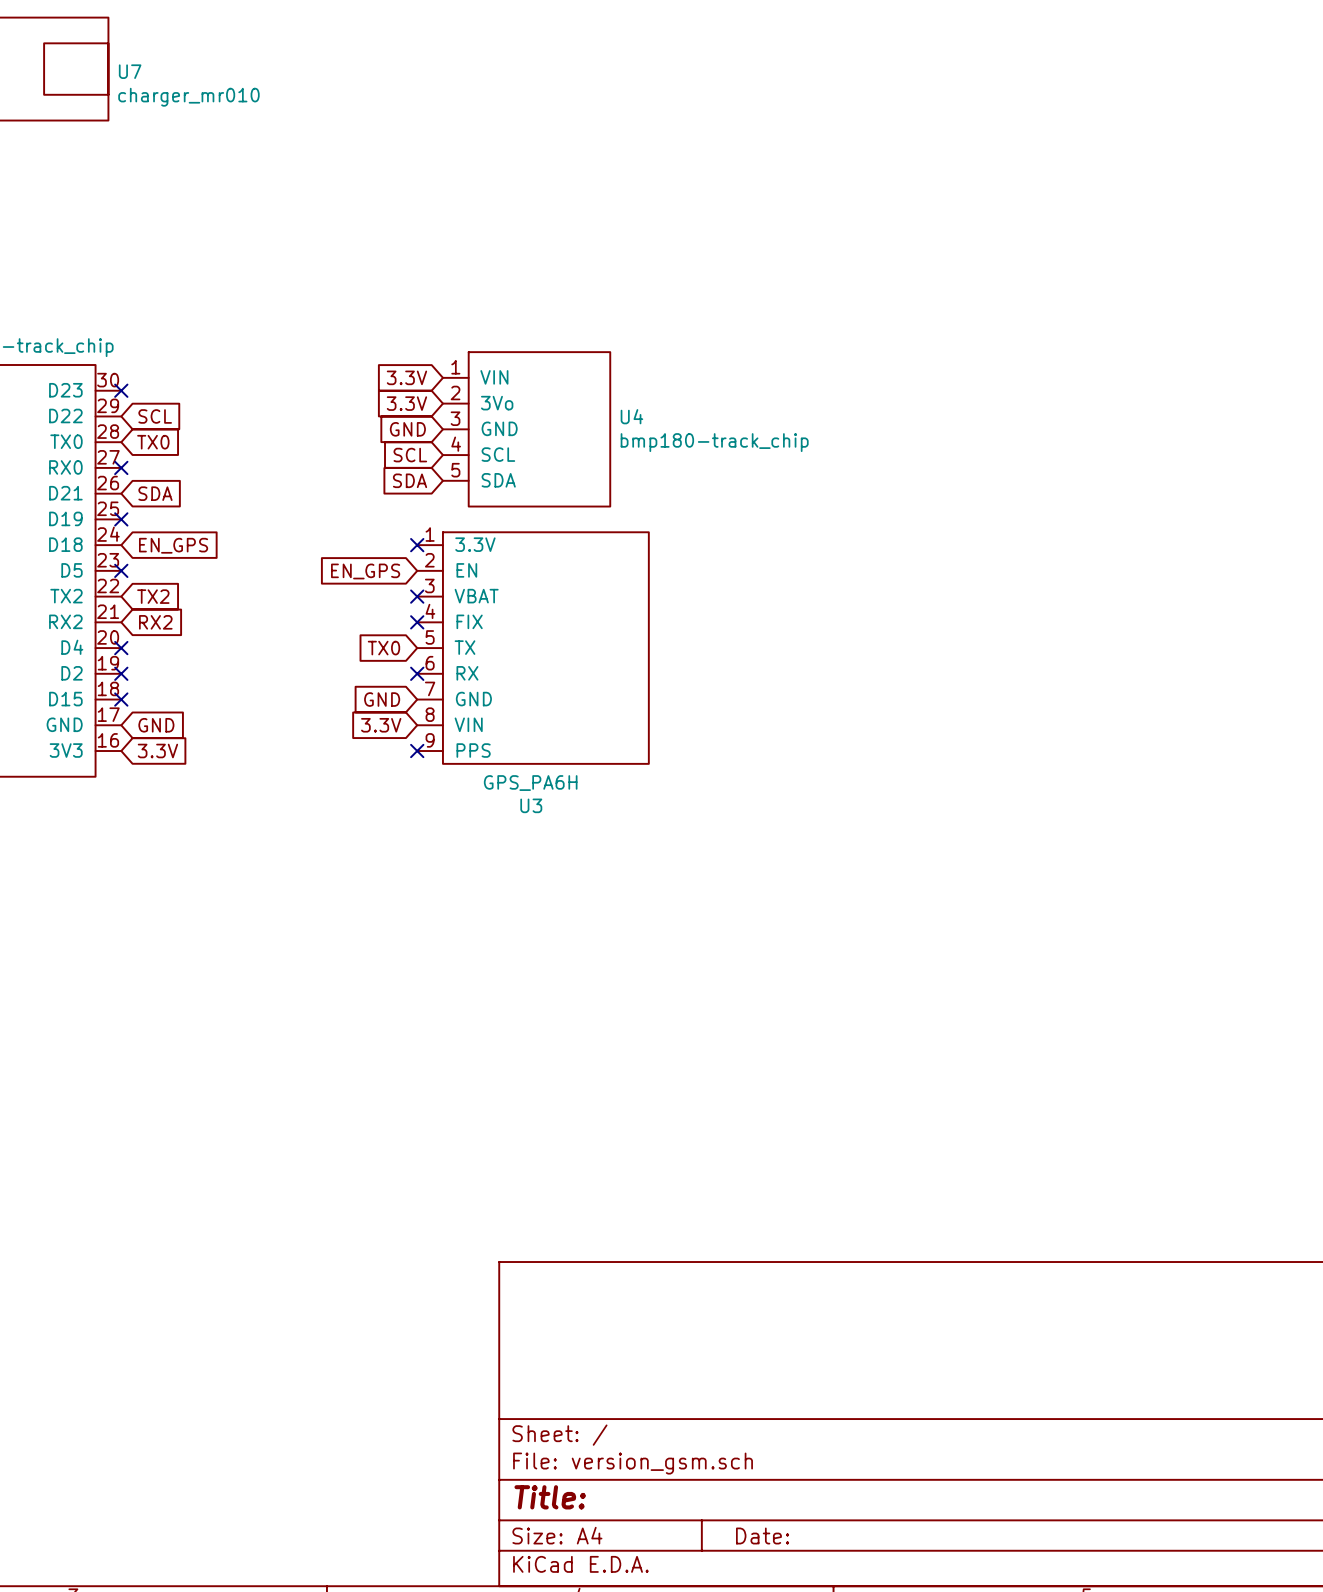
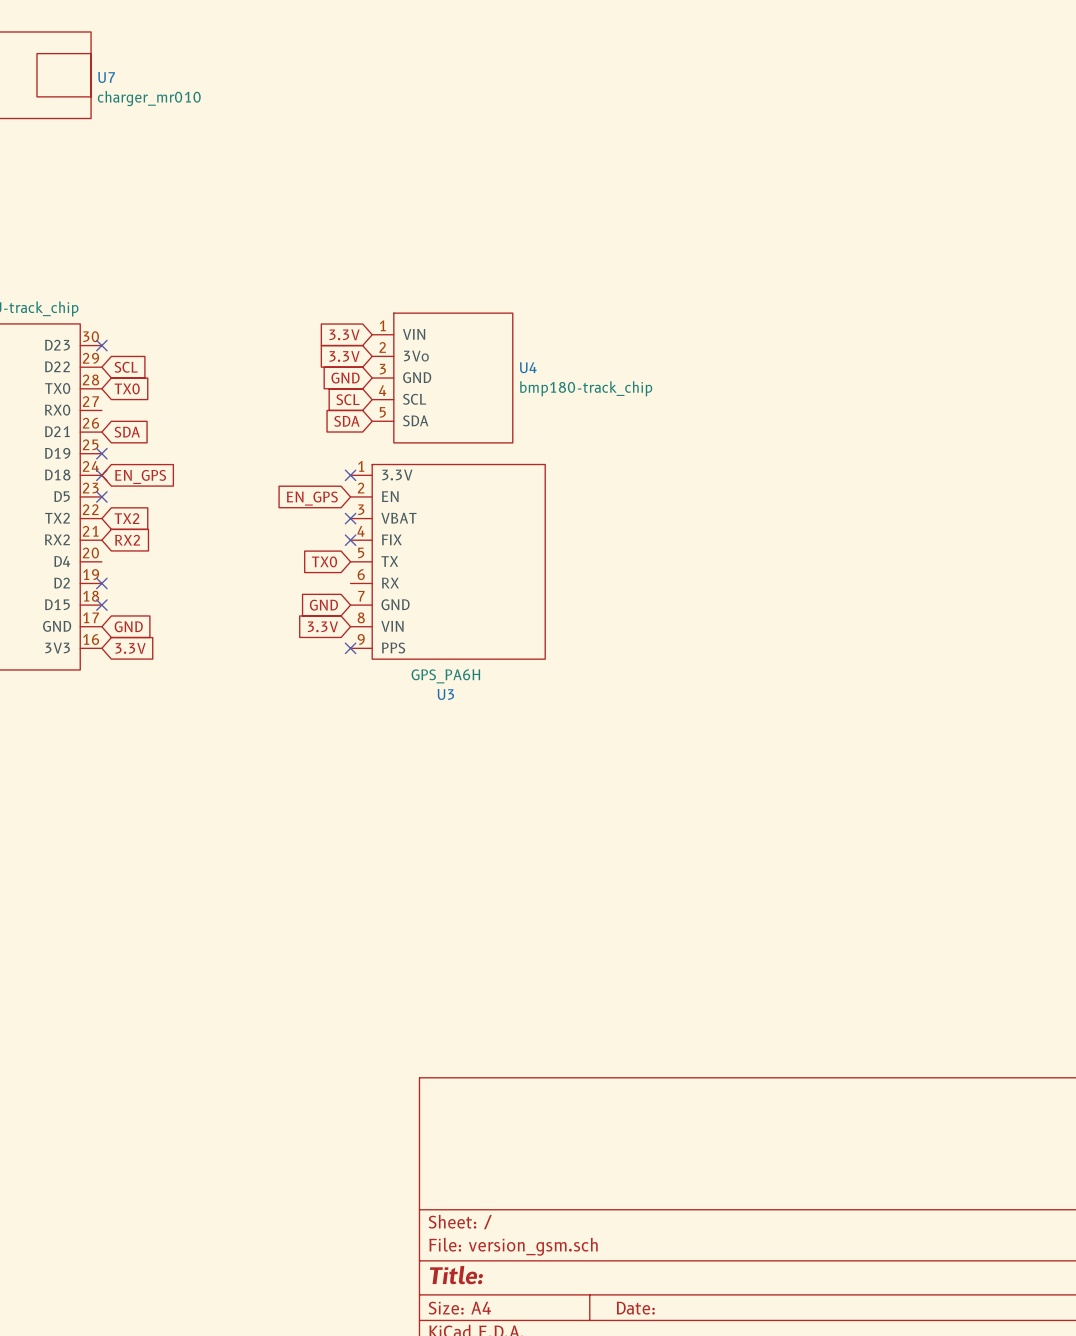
no-connect mark: (121, 467) -> none
no-connect mark: none -> (101, 475)
no-connect mark: (121, 648) -> none
no-connect mark: (417, 673) -> none

